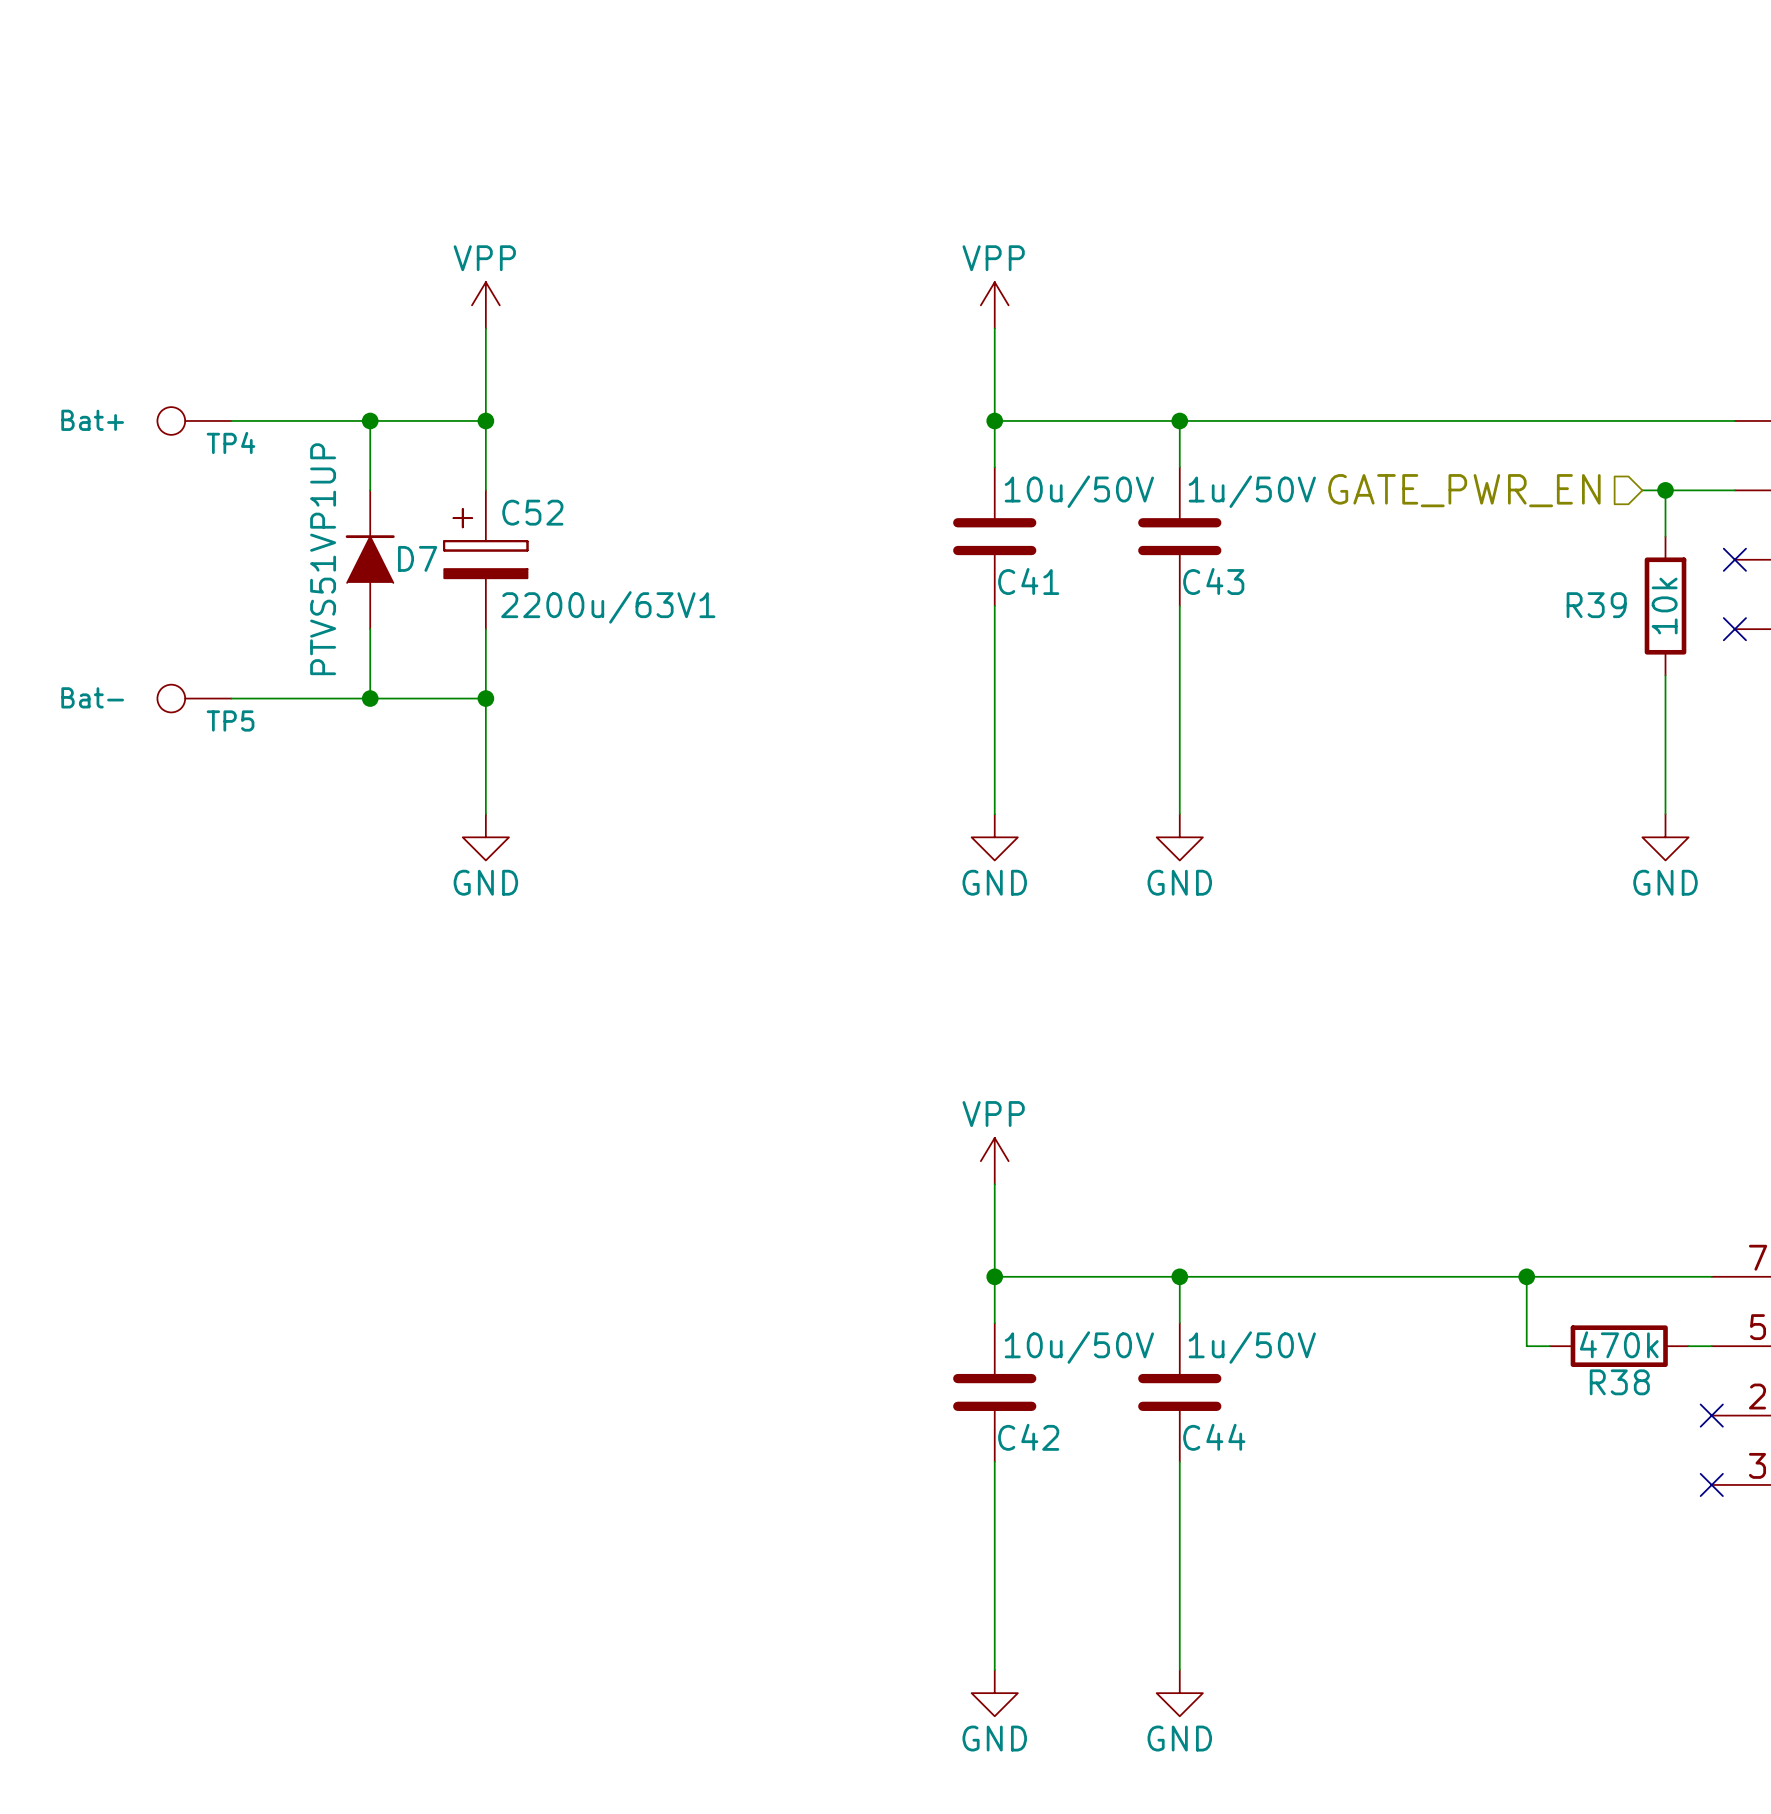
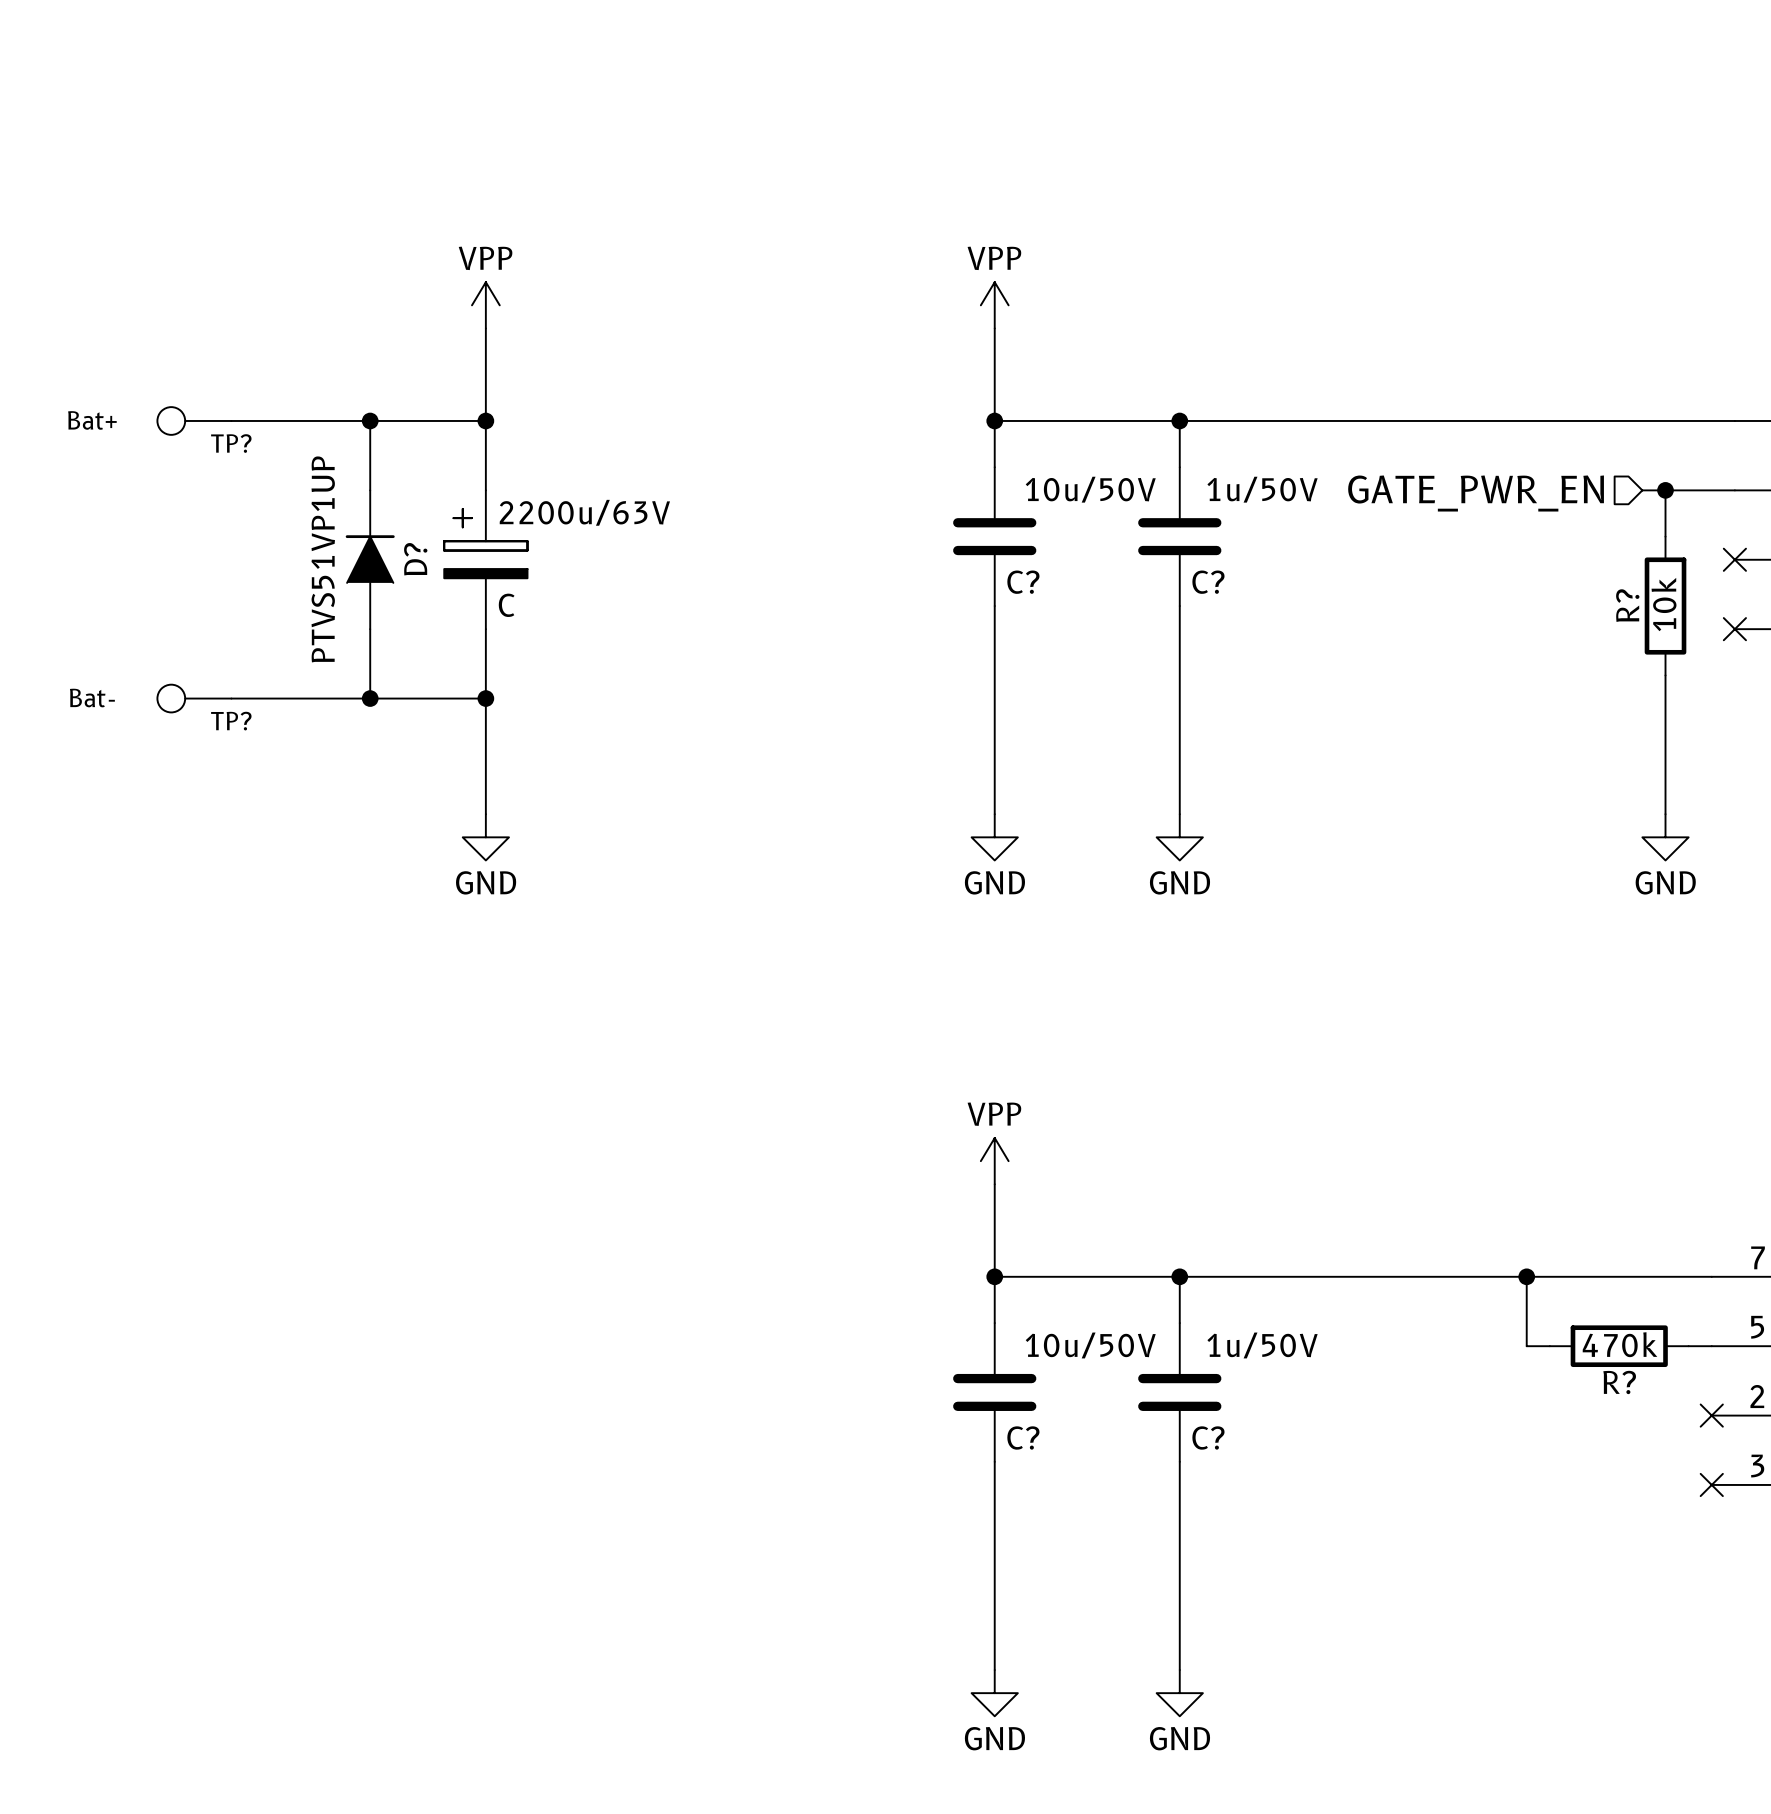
TP4 name: TP4 (230, 442) -> TP? (231, 443)
C52 name: C52 (532, 512) -> 2200u/63V (584, 512)
D7 name: D7 (417, 558) -> D? (415, 559)
C41 name: C41 (1028, 581) -> C? (1023, 582)
C43 name: C43 (1213, 581) -> C? (1208, 582)
R39 name: R39 (1596, 605) -> R? (1627, 605)
C52 value: 2200u/63V1 (608, 607) -> C (506, 605)
TP5 name: TP5 (230, 720) -> TP? (231, 721)
R38 name: R38 (1619, 1382) -> R? (1619, 1382)
C42 name: C42 (1028, 1437) -> C? (1023, 1438)
C44 name: C44 (1214, 1437) -> C? (1208, 1438)

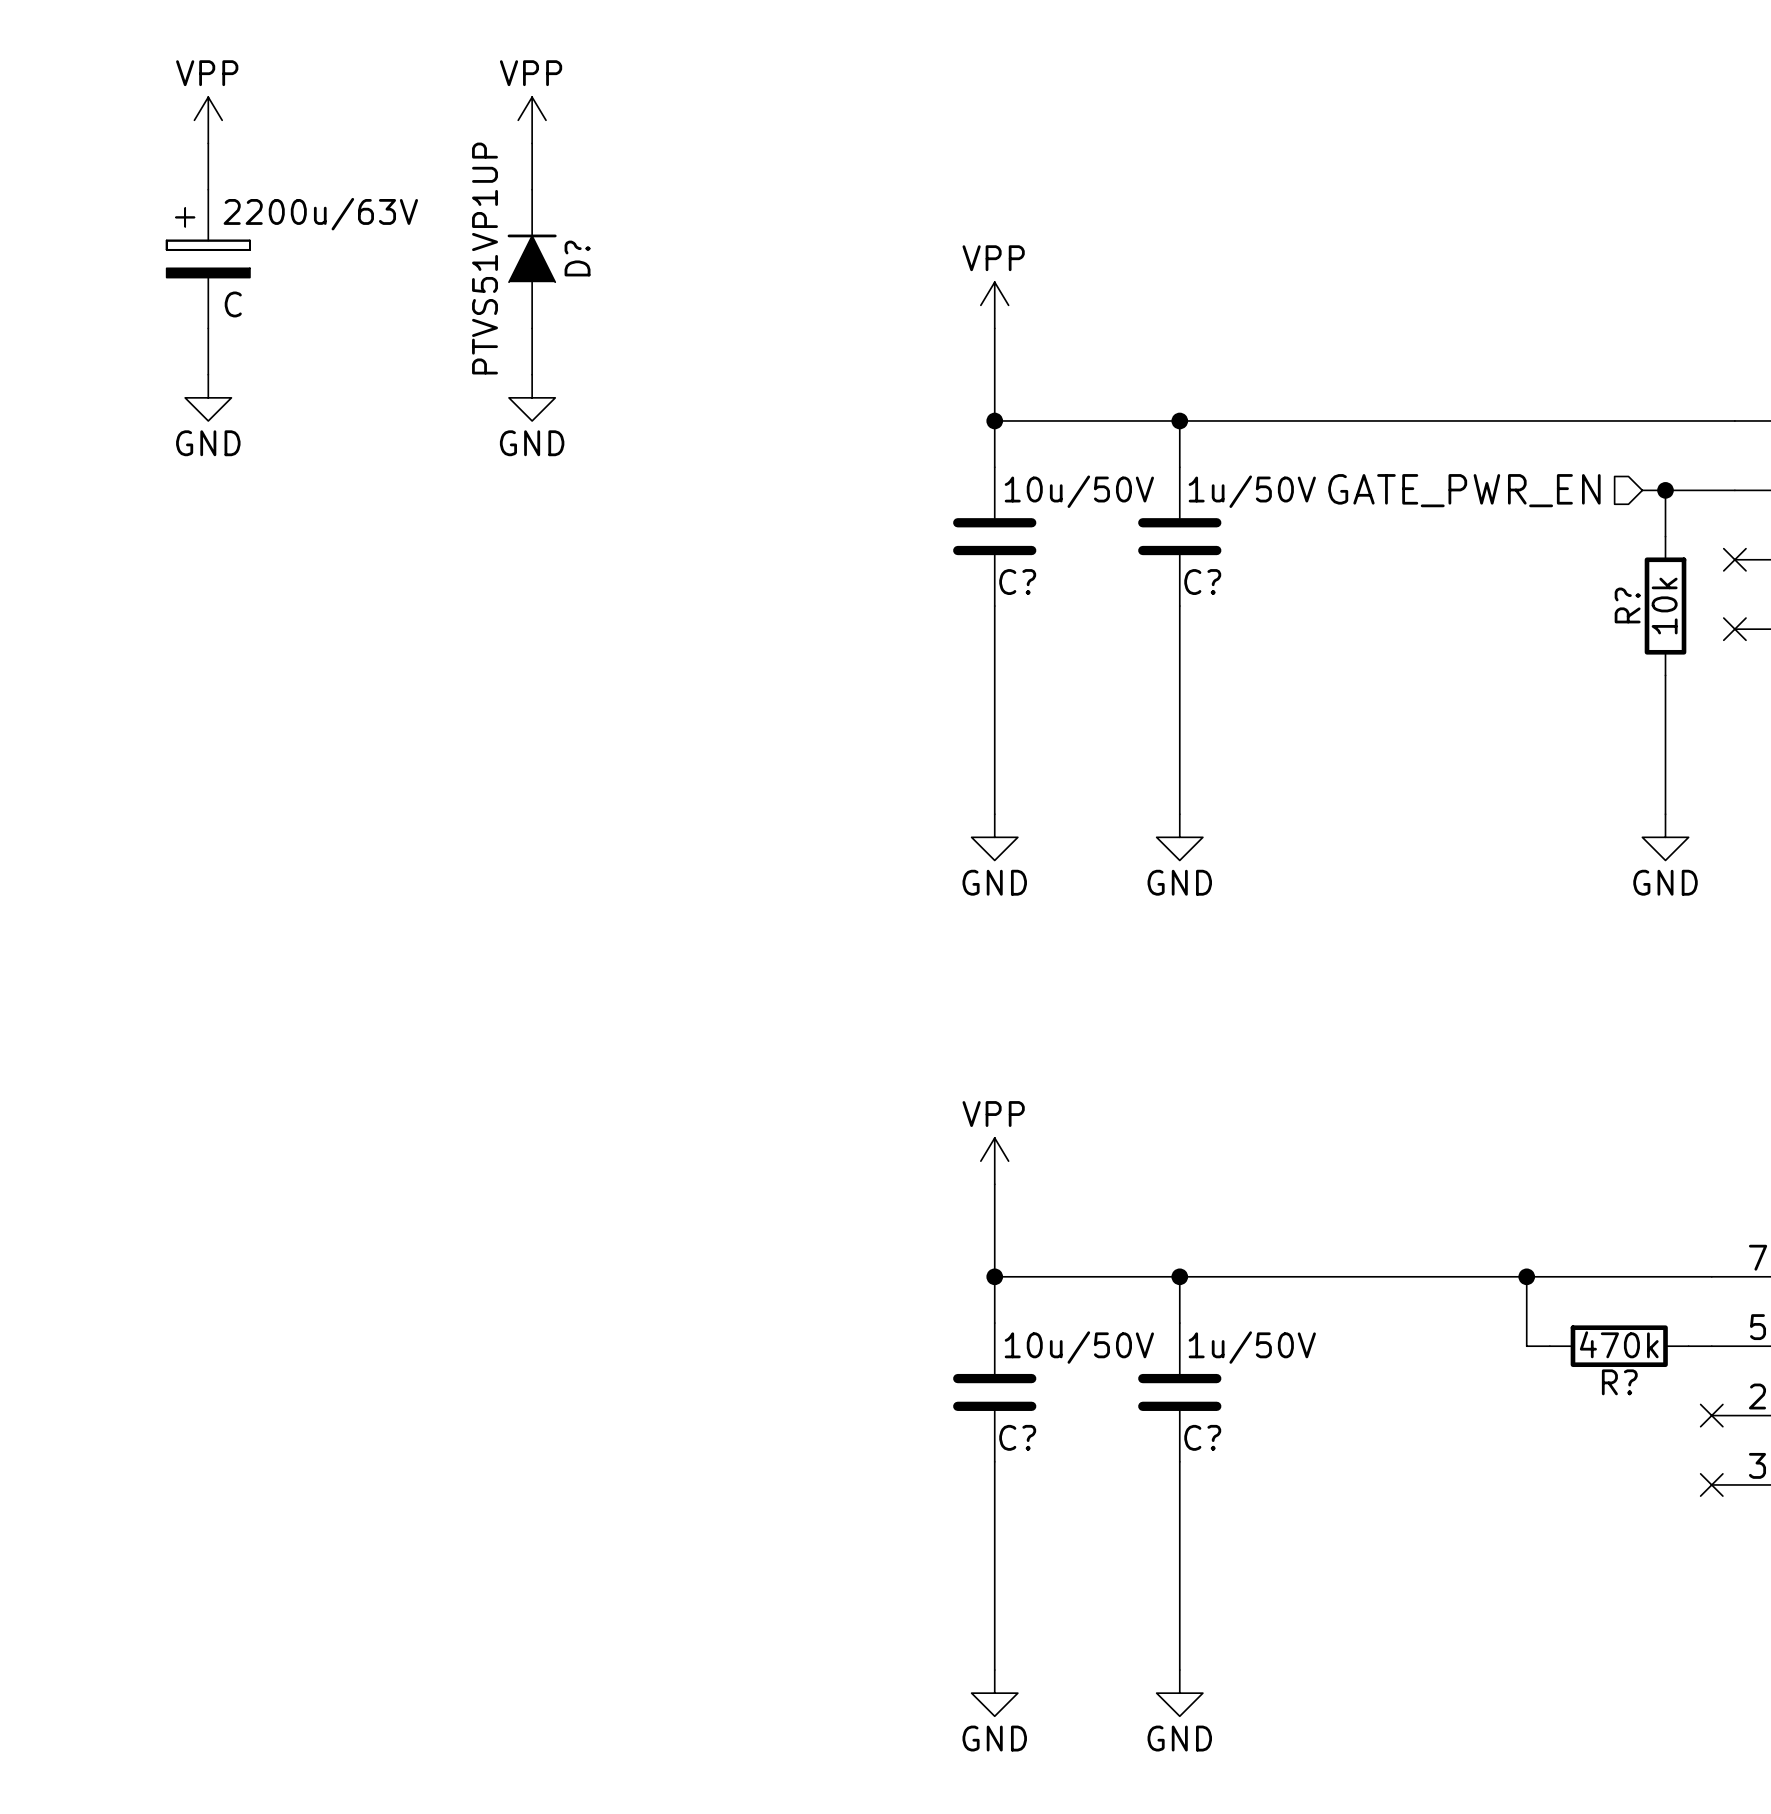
power symbol: none -> VPP (208, 120)
power symbol: none -> VPP (532, 120)
wire: none -> (208, 143) (208, 189)
wire: none -> (532, 143) (532, 189)
power symbol: VPP (485, 305) -> none
wire: none -> (208, 328) (208, 374)
wire: (485, 328) (485, 490) -> none
wire: none -> (532, 328) (532, 374)
power symbol: none -> GND (208, 397)
power symbol: none -> GND (532, 397)
TP?: Bat+ (194, 420) -> none
wire: (231, 420) (485, 420) -> none
wire: (370, 420) (370, 490) -> none
junction: (370, 420) -> none
junction: (485, 420) -> none
D? position: (370, 559) -> (532, 259)
2200u/63V position: (485, 559) -> (208, 259)
wire: (370, 629) (370, 698) -> none
wire: (485, 629) (485, 814) -> none
TP?: Bat- (194, 698) -> none
wire: (231, 698) (485, 698) -> none
junction: (370, 698) -> none
junction: (485, 698) -> none
power symbol: GND (485, 837) -> none

